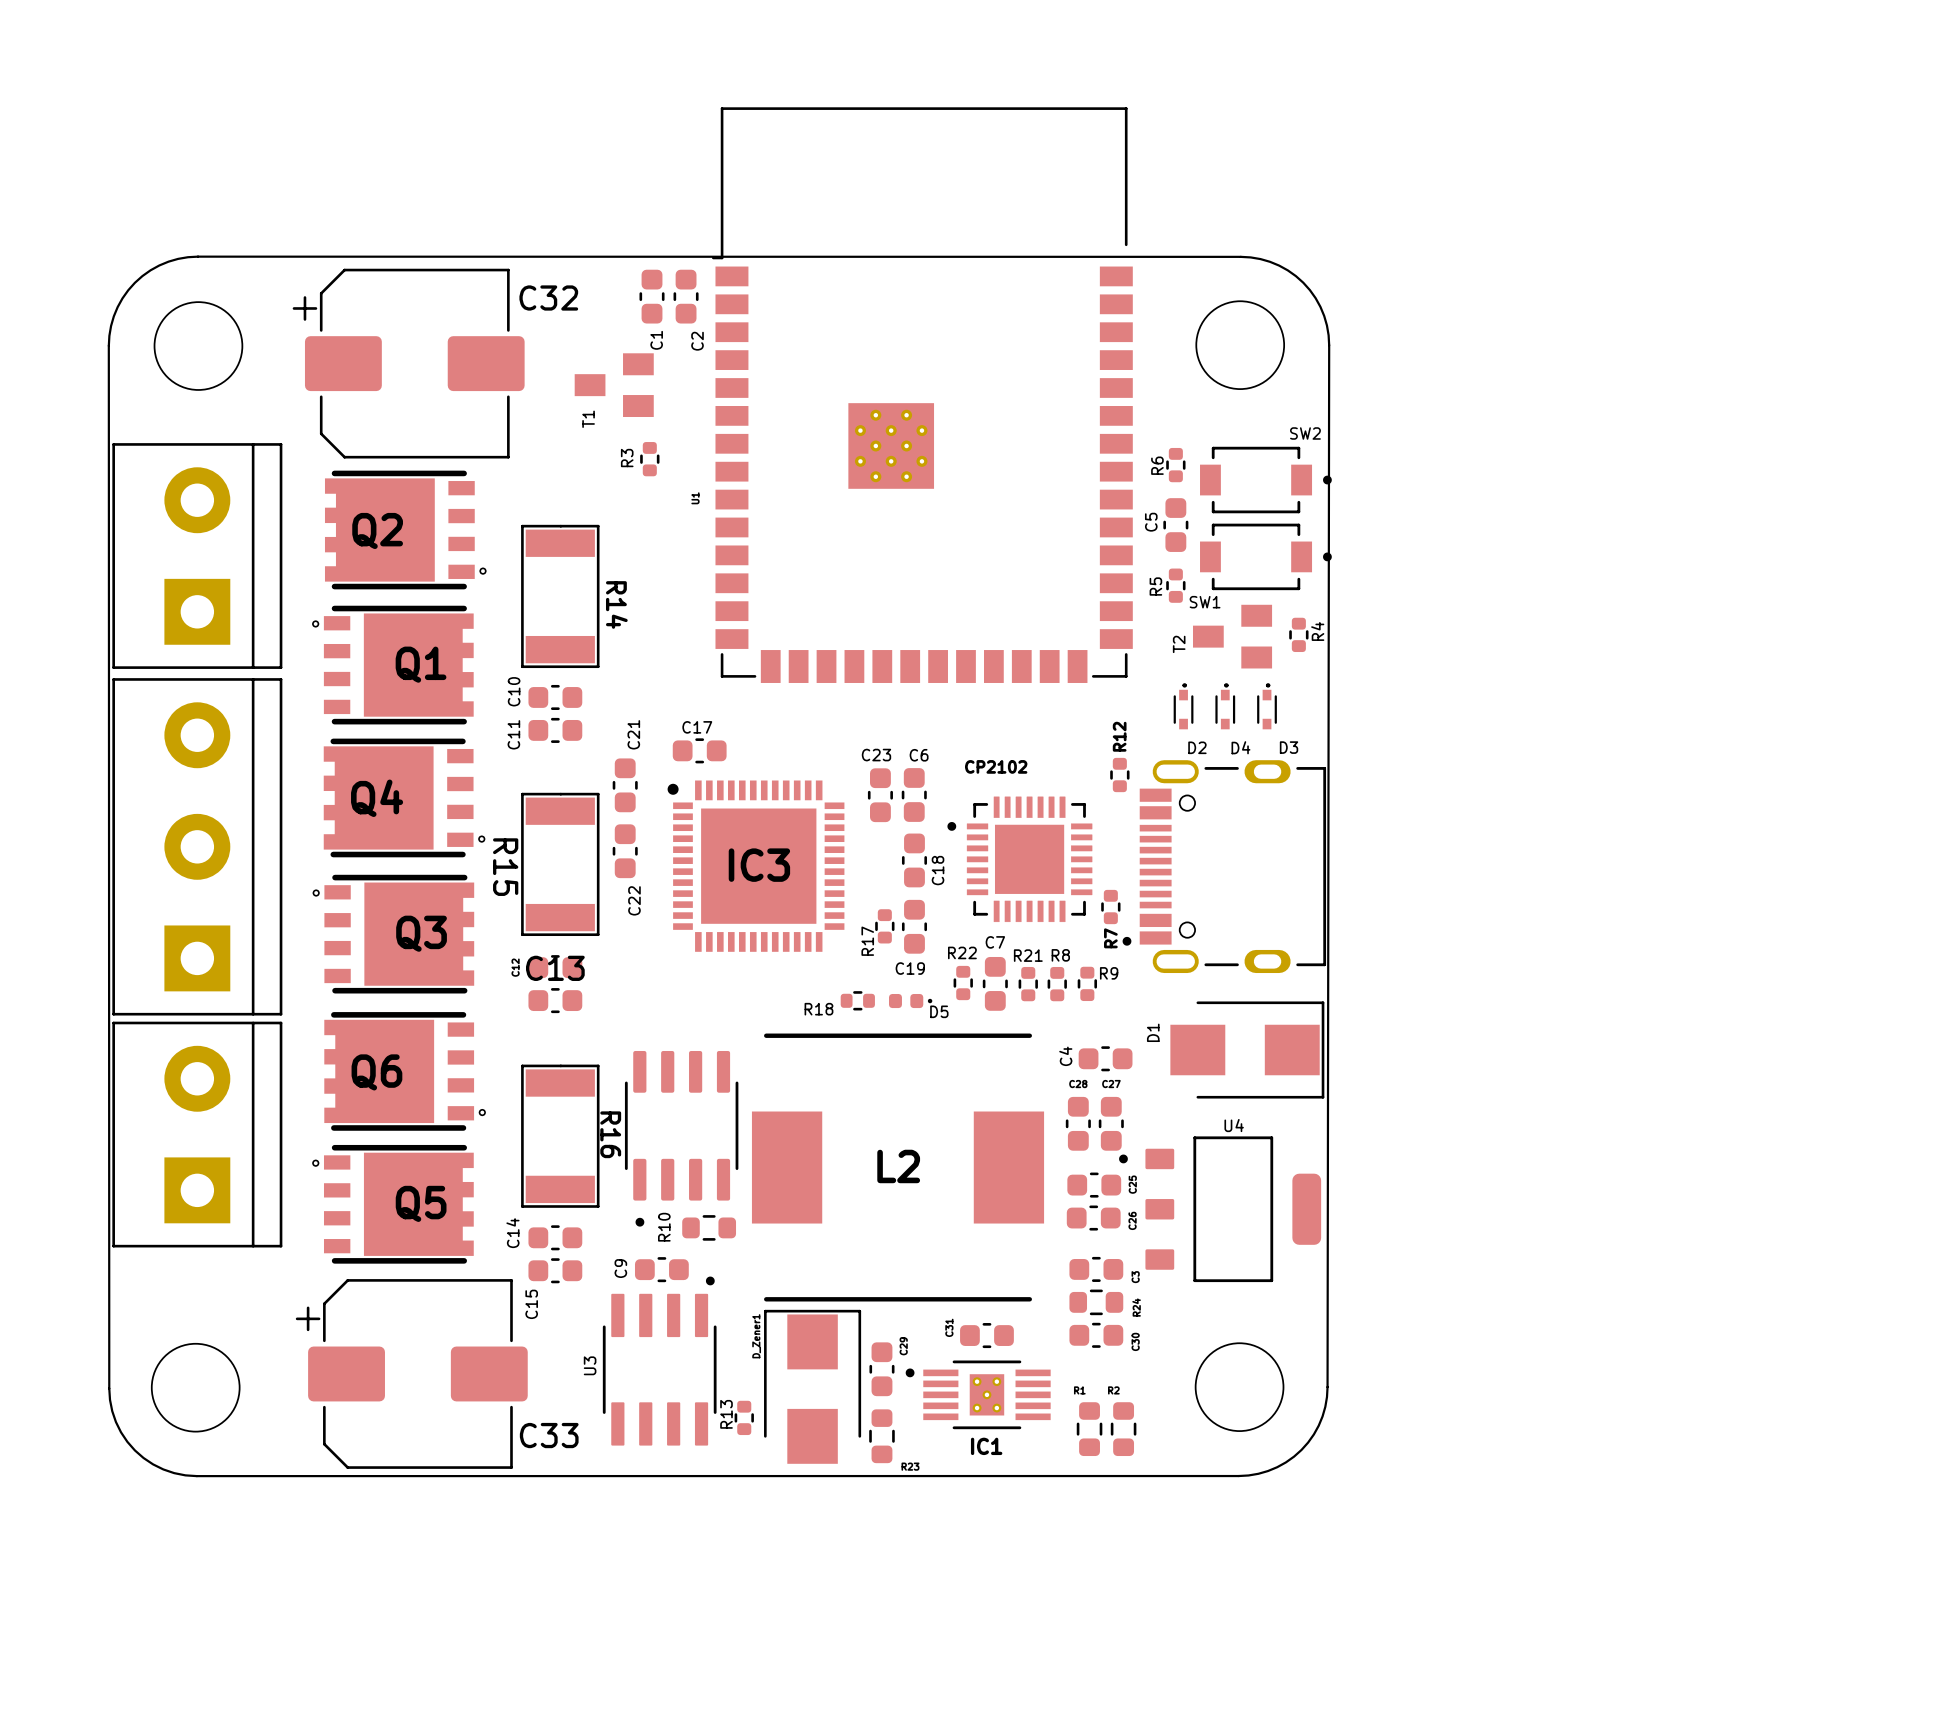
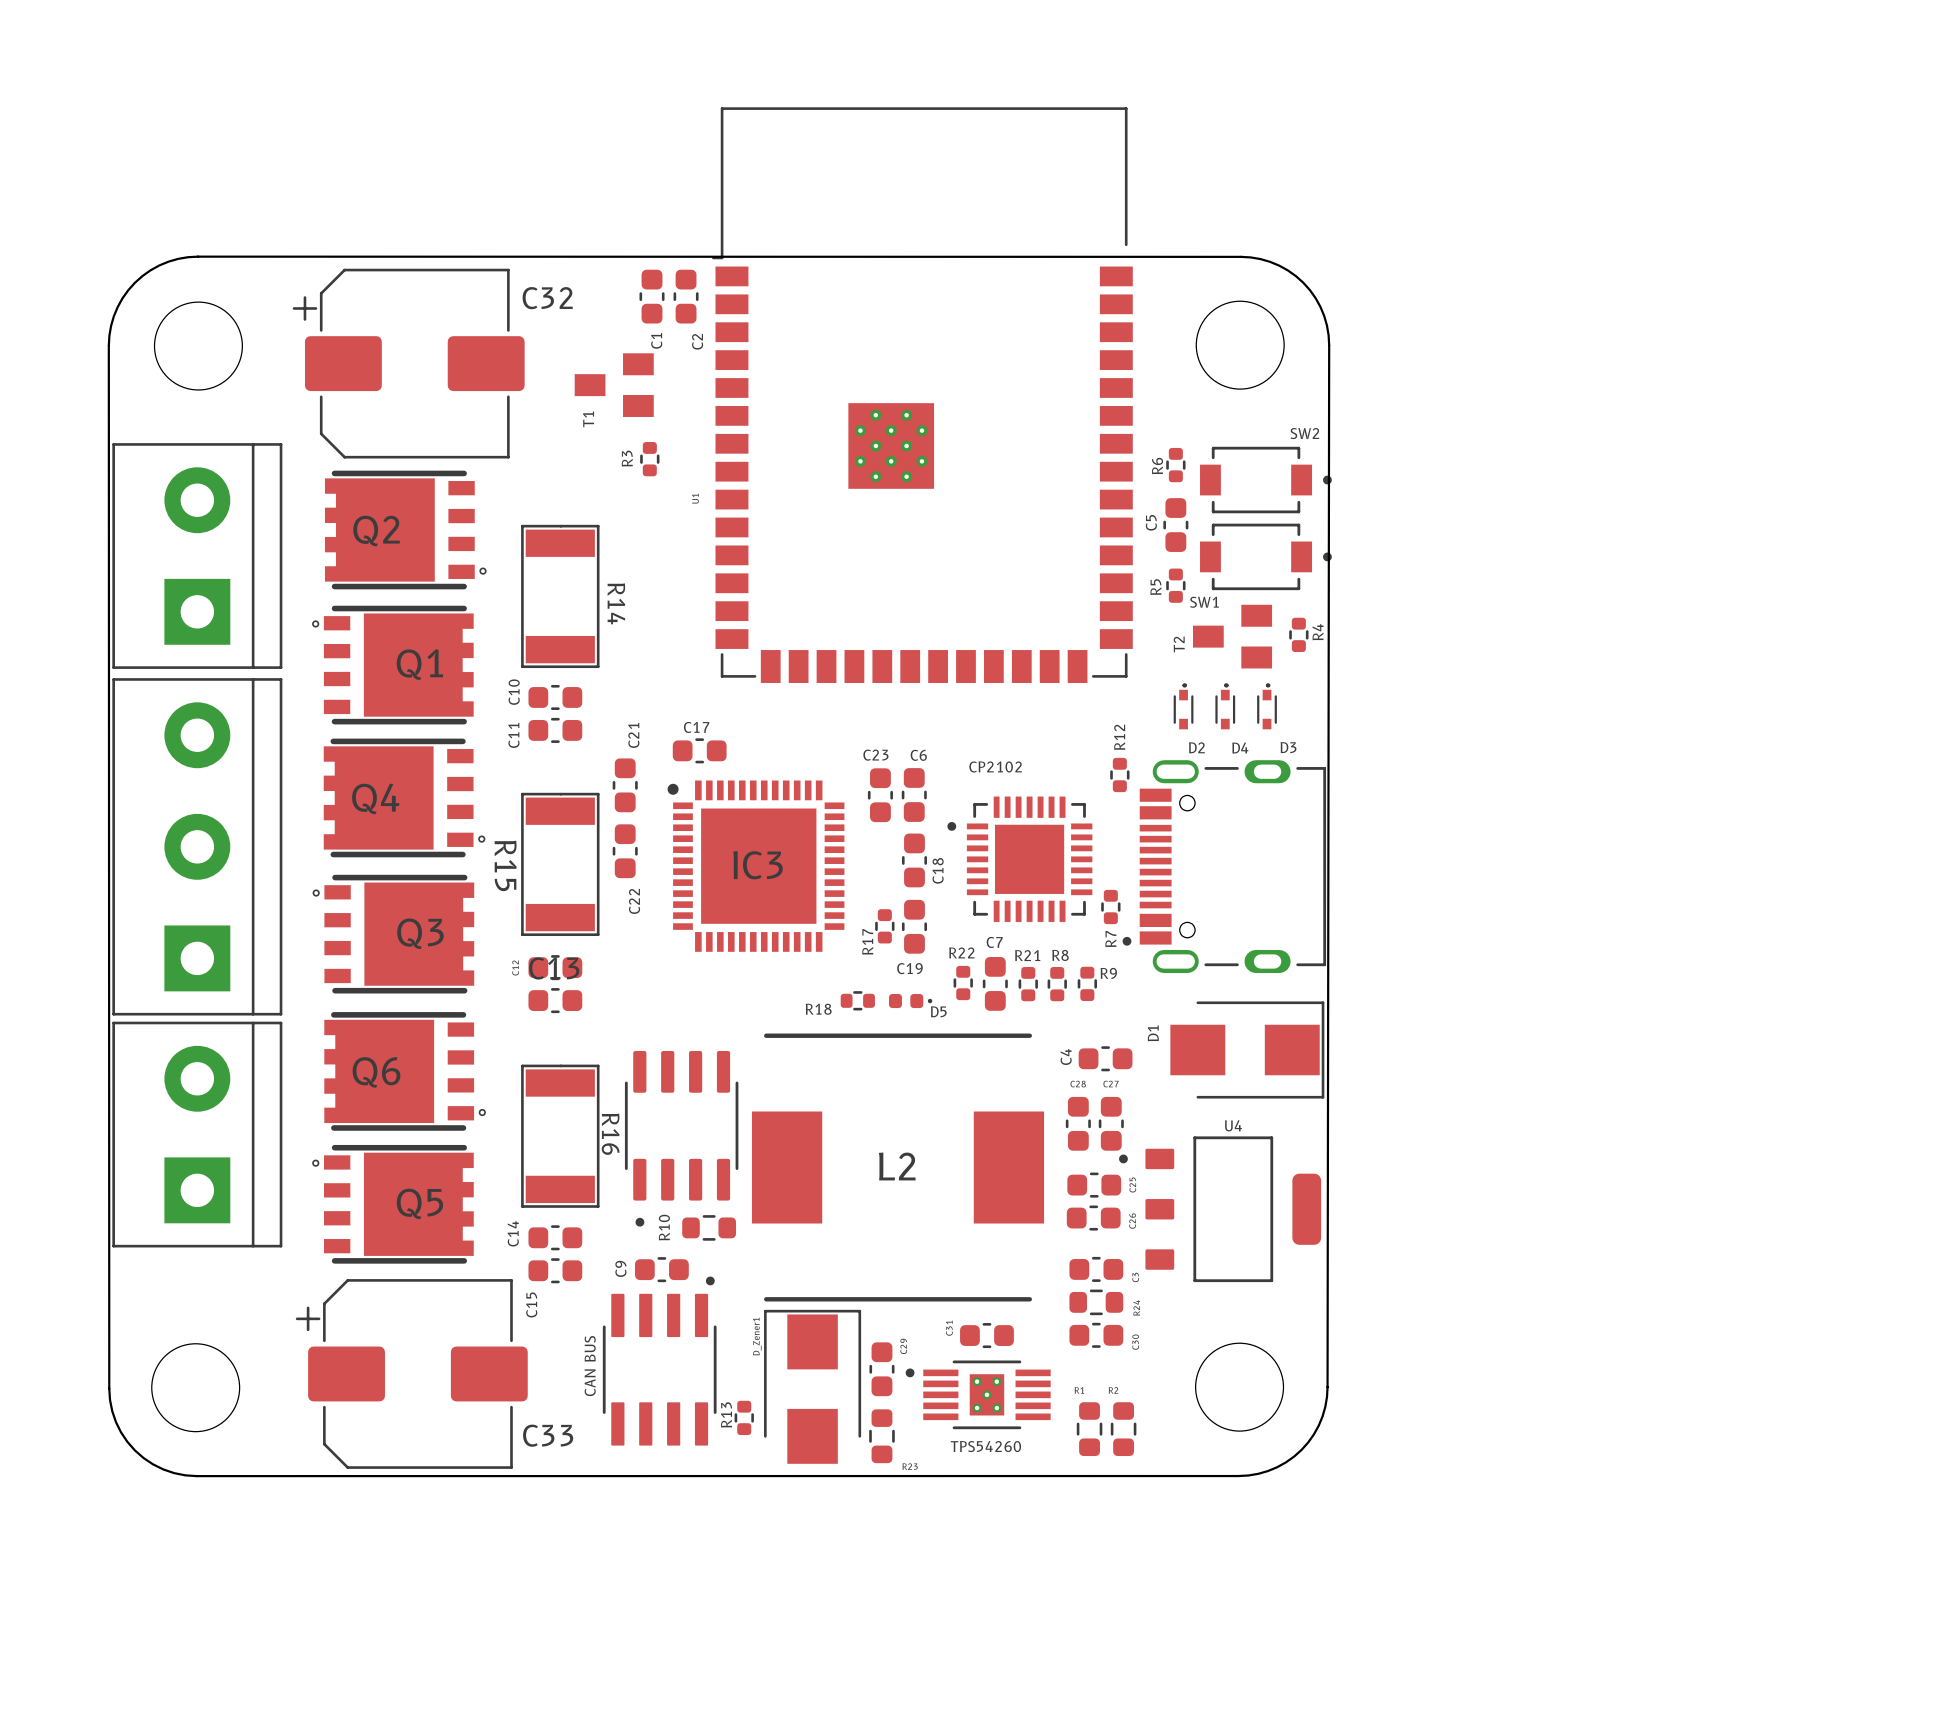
U3 name: U3 (590, 1365) -> CAN BUS (590, 1366)
IC1 name: IC1 (986, 1446) -> TPS54260 (985, 1446)

